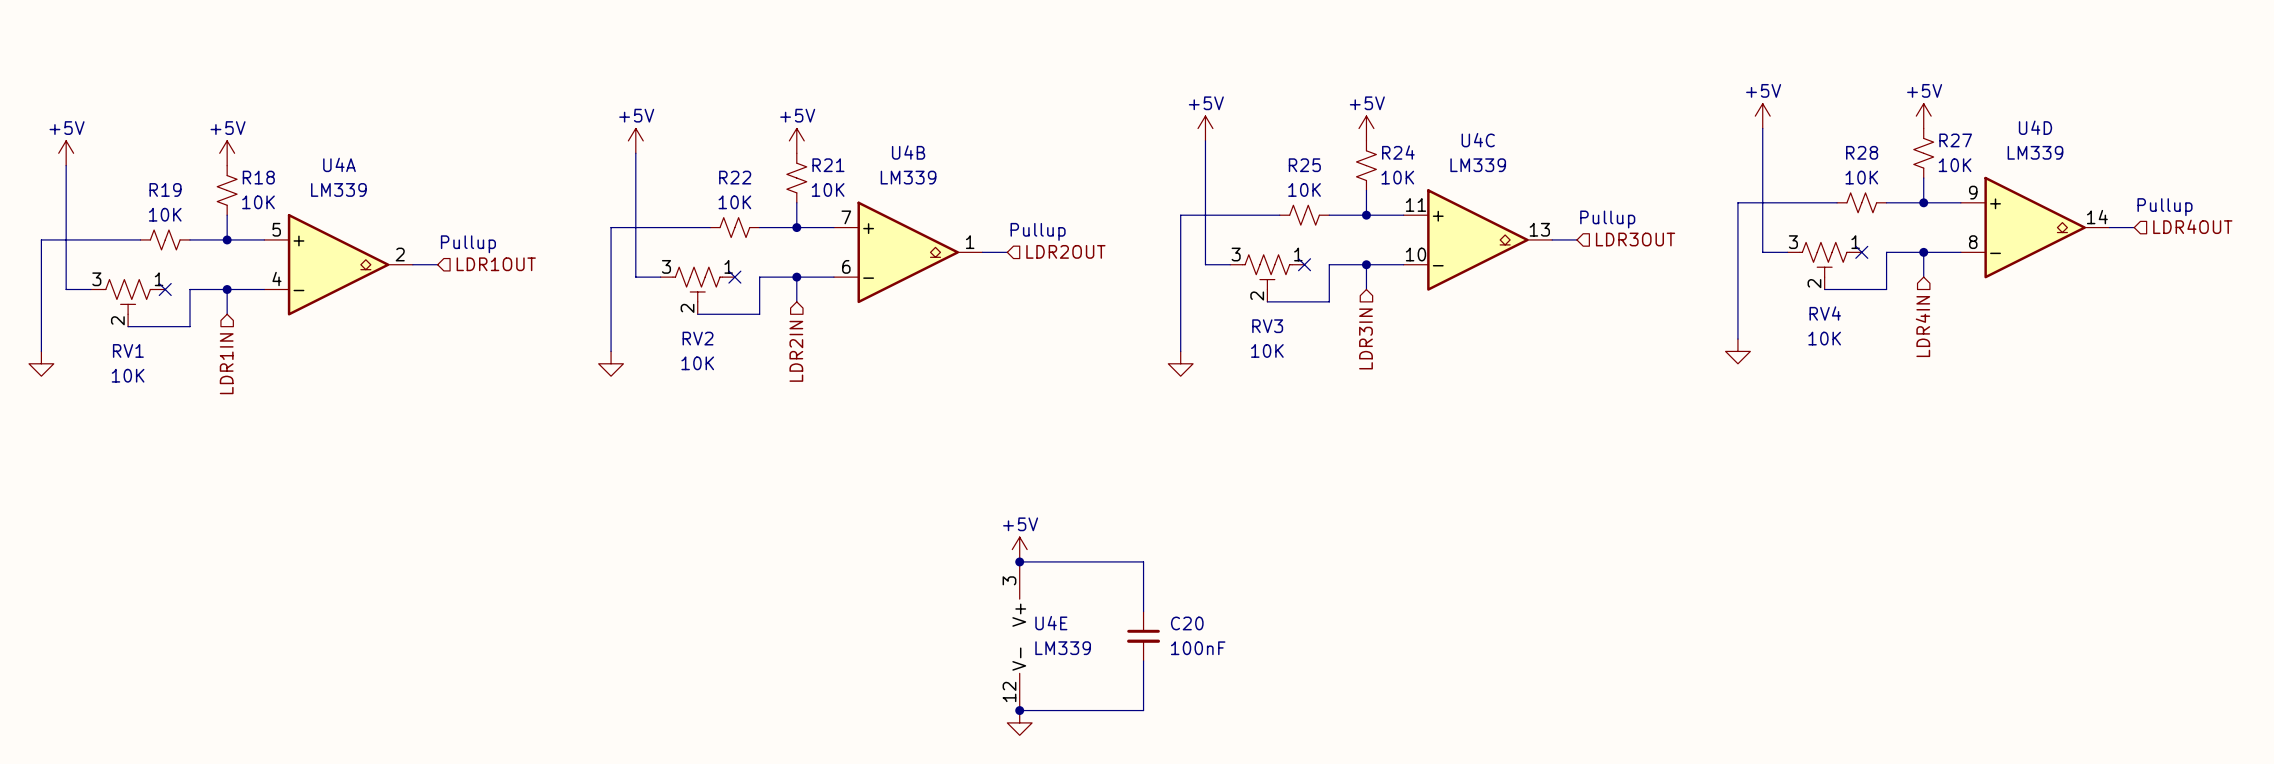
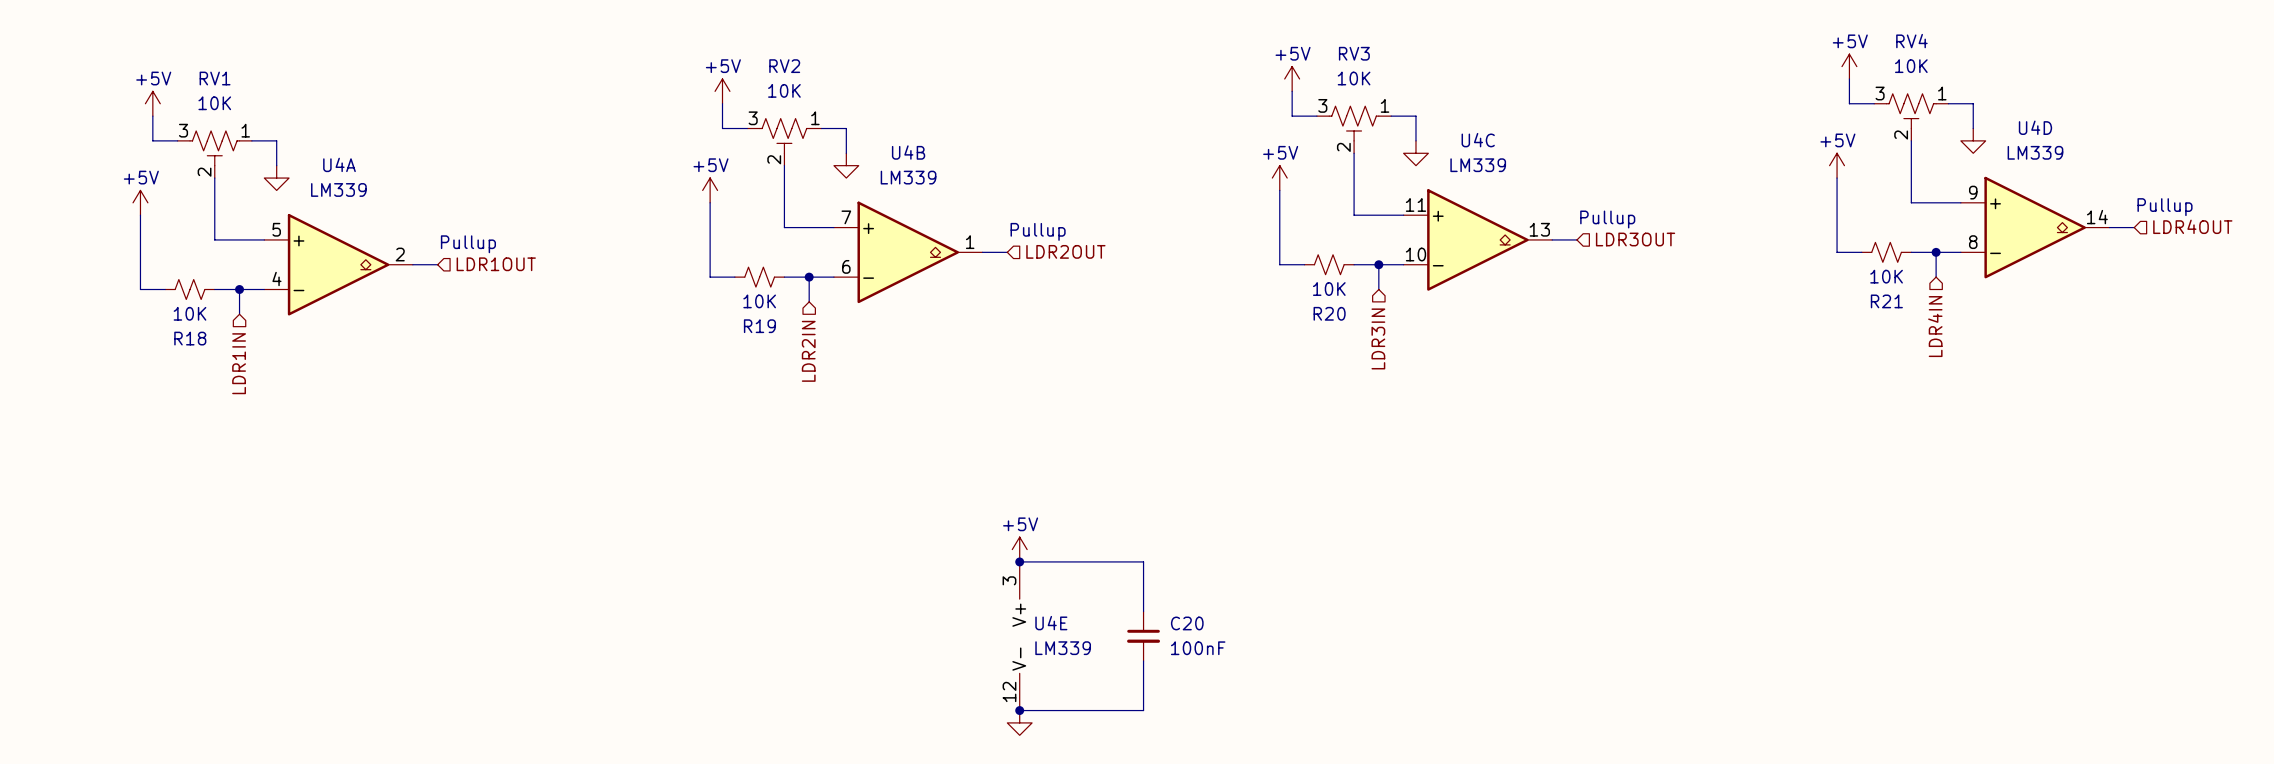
power symbol: none -> +5V (1849, 66)
power symbol: none -> +5V (1292, 78)
wire: none -> (1849, 78) (1849, 103) (1874, 103)
power symbol: none -> +5V (722, 91)
wire: none -> (1292, 91) (1292, 116) (1316, 116)
power symbol: none -> +5V (152, 103)
wire: none -> (722, 103) (722, 128) (747, 128)
wire: none -> (1948, 103) (1973, 103) (1973, 128)
wire: none -> (152, 116) (152, 140) (177, 140)
wire: none -> (1391, 116) (1415, 116) (1415, 140)
power symbol: +5V (1762, 116) -> none
power symbol: +5V (1923, 116) -> none
wire: none -> (821, 128) (846, 128) (846, 153)
power symbol: +5V (1205, 128) -> none
power symbol: +5V (1366, 128) -> none
wire: (1762, 128) (1762, 252) (1787, 252) -> none
wire: none -> (251, 140) (276, 140) (276, 165)
power symbol: +5V (635, 140) -> none
power symbol: +5V (796, 140) -> none
wire: (1205, 140) (1205, 264) (1230, 264) -> none
power symbol: none -> (1973, 140)
power symbol: +5V (66, 153) -> none
power symbol: +5V (227, 153) -> none
wire: (635, 153) (635, 277) (660, 277) -> none
power symbol: none -> (1415, 153)
R27: 10K (1923, 153) -> none
wire: (66, 165) (66, 289) (90, 289) -> none
R21 name position: R21 (828, 165) -> R21 (1886, 301)
power symbol: none -> (846, 165)
R24: 10K (1366, 165) -> none
power symbol: none -> +5V (1837, 165)
R18 name position: R18 (258, 177) -> R18 (190, 338)
power symbol: none -> (276, 178)
R21 rotation: 0° (796, 178) -> 90° clockwise (1886, 252)
R21 position: (796, 178) -> (1886, 252)
power symbol: none -> +5V (1279, 178)
wire: none -> (1837, 178) (1837, 252) (1861, 252)
wire: (1923, 178) (1923, 202) -> none
R19 name position: R19 (165, 189) -> R19 (759, 326)
R18 rotation: 0° (227, 190) -> 90° clockwise (190, 289)
R18 position: (227, 190) -> (190, 289)
power symbol: none -> +5V (710, 190)
wire: none -> (1279, 190) (1279, 264) (1304, 264)
wire: (1366, 190) (1366, 215) -> none
power symbol: none -> +5V (140, 202)
wire: none -> (710, 202) (710, 277) (734, 277)
wire: (796, 202) (796, 227) -> none
wire: (1837, 202) (1737, 202) (1737, 339) -> none
R28: 10K (1861, 202) -> none
wire: (1886, 202) (1911, 202) -> (1911, 140) (1911, 202)
junction: (1923, 202) -> none
R19 value position: 10K (165, 214) -> 10K (759, 301)
wire: none -> (140, 215) (140, 289) (165, 289)
wire: (227, 215) (227, 239) -> none
wire: (1279, 215) (1180, 215) (1180, 351) -> none
R25: 10K (1304, 215) -> none
wire: (1329, 215) (1354, 215) -> (1354, 153) (1354, 215)
junction: (1366, 215) -> none
wire: (710, 227) (611, 227) (611, 351) -> none
R22: 10K (734, 227) -> none
wire: (759, 227) (784, 227) -> (784, 165) (784, 227)
junction: (796, 227) -> none
wire: (140, 239) (41, 239) (41, 351) -> none
R19 position: (165, 239) -> (759, 277)
wire: (190, 239) (214, 239) -> (214, 178) (214, 239)
junction: (227, 239) -> none
no-connect mark: (1861, 252) -> none
wire: (1911, 252) (1886, 252) (1886, 289) (1824, 289) -> none
wire: (1923, 252) (1923, 277) -> (1936, 252) (1936, 277)
junction position: (1923, 252) -> (1936, 252)
no-connect mark: (1304, 264) -> none
R20: none -> 10K (1329, 264)
wire: (1354, 264) (1329, 264) (1329, 301) (1267, 301) -> none
wire: (1366, 264) (1366, 289) -> (1378, 264) (1378, 289)
junction position: (1366, 264) -> (1378, 264)
RV4 position: (1824, 265) -> (1911, 117)
no-connect mark: (734, 277) -> none
wire: (784, 277) (759, 277) (759, 314) (697, 314) -> none
wire: (796, 277) (796, 301) -> (809, 277) (809, 301)
junction position: (796, 277) -> (809, 277)
RV3 position: (1267, 278) -> (1354, 129)
no-connect mark: (165, 289) -> none
wire: (214, 289) (190, 289) (190, 326) (128, 326) -> none
wire: (227, 289) (227, 314) -> (239, 289) (239, 314)
junction position: (227, 289) -> (239, 289)
RV2 position: (697, 290) -> (784, 142)
RV1 position: (128, 303) -> (214, 154)
RV4 name position: RV4 (1825, 313) -> RV4 (1911, 41)
RV3 name position: RV3 (1267, 326) -> RV3 (1354, 53)
hierarchical label position: LDR4IN (1922, 326) -> LDR4IN (1935, 326)
RV2 name position: RV2 (698, 338) -> RV2 (784, 66)
hierarchical label position: LDR3IN (1365, 338) -> LDR3IN (1378, 338)
RV4 value position: 10K (1824, 338) -> 10K (1911, 66)
RV1 name position: RV1 (128, 350) -> RV1 (215, 78)
RV3 value position: 10K (1267, 350) -> 10K (1354, 78)
hierarchical label position: LDR2IN (796, 351) -> LDR2IN (808, 351)
power symbol: (1737, 351) -> none
power symbol: (41, 363) -> none
hierarchical label position: LDR1IN (226, 363) -> LDR1IN (239, 363)
power symbol: (611, 363) -> none
RV2 value position: 10K (697, 363) -> 10K (784, 90)
power symbol: (1180, 363) -> none
RV1 value position: 10K (128, 375) -> 10K (214, 103)

